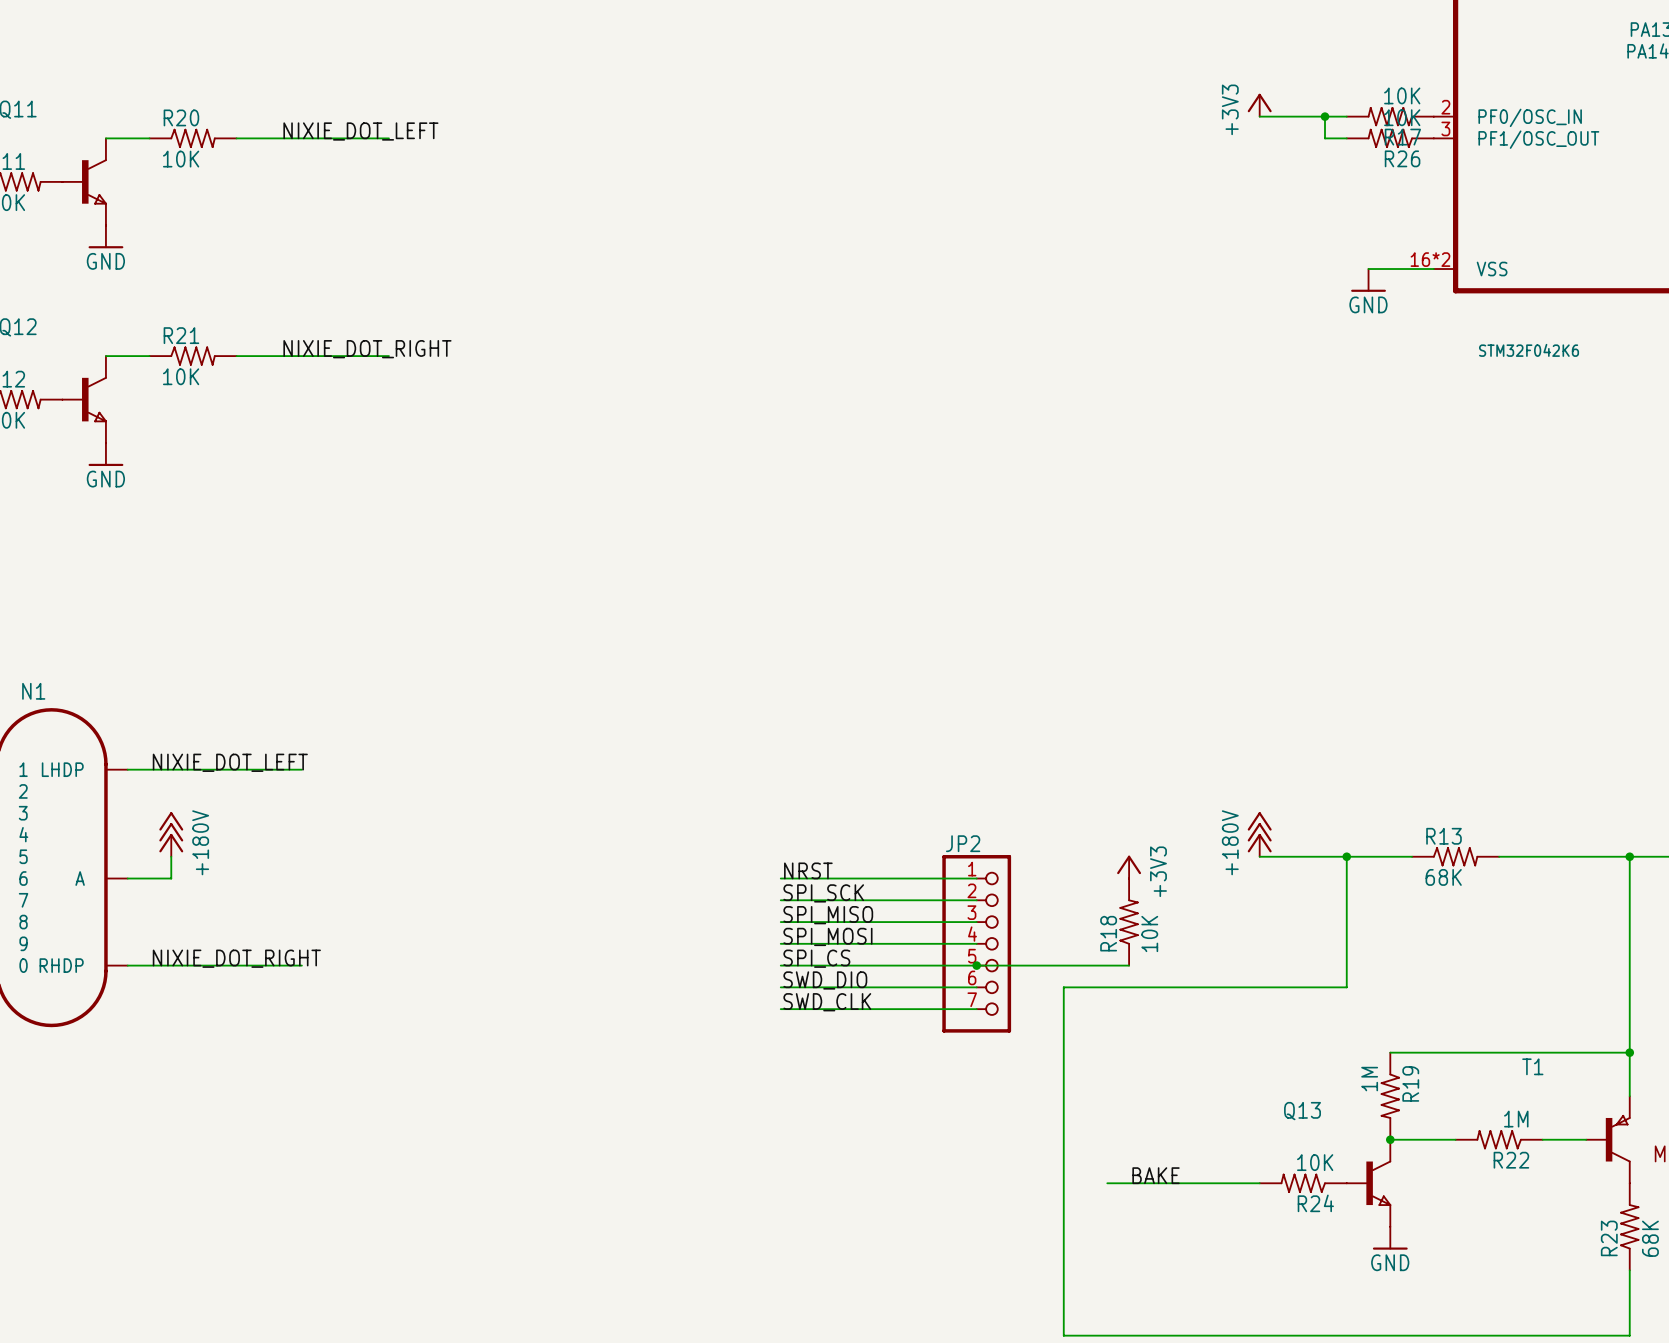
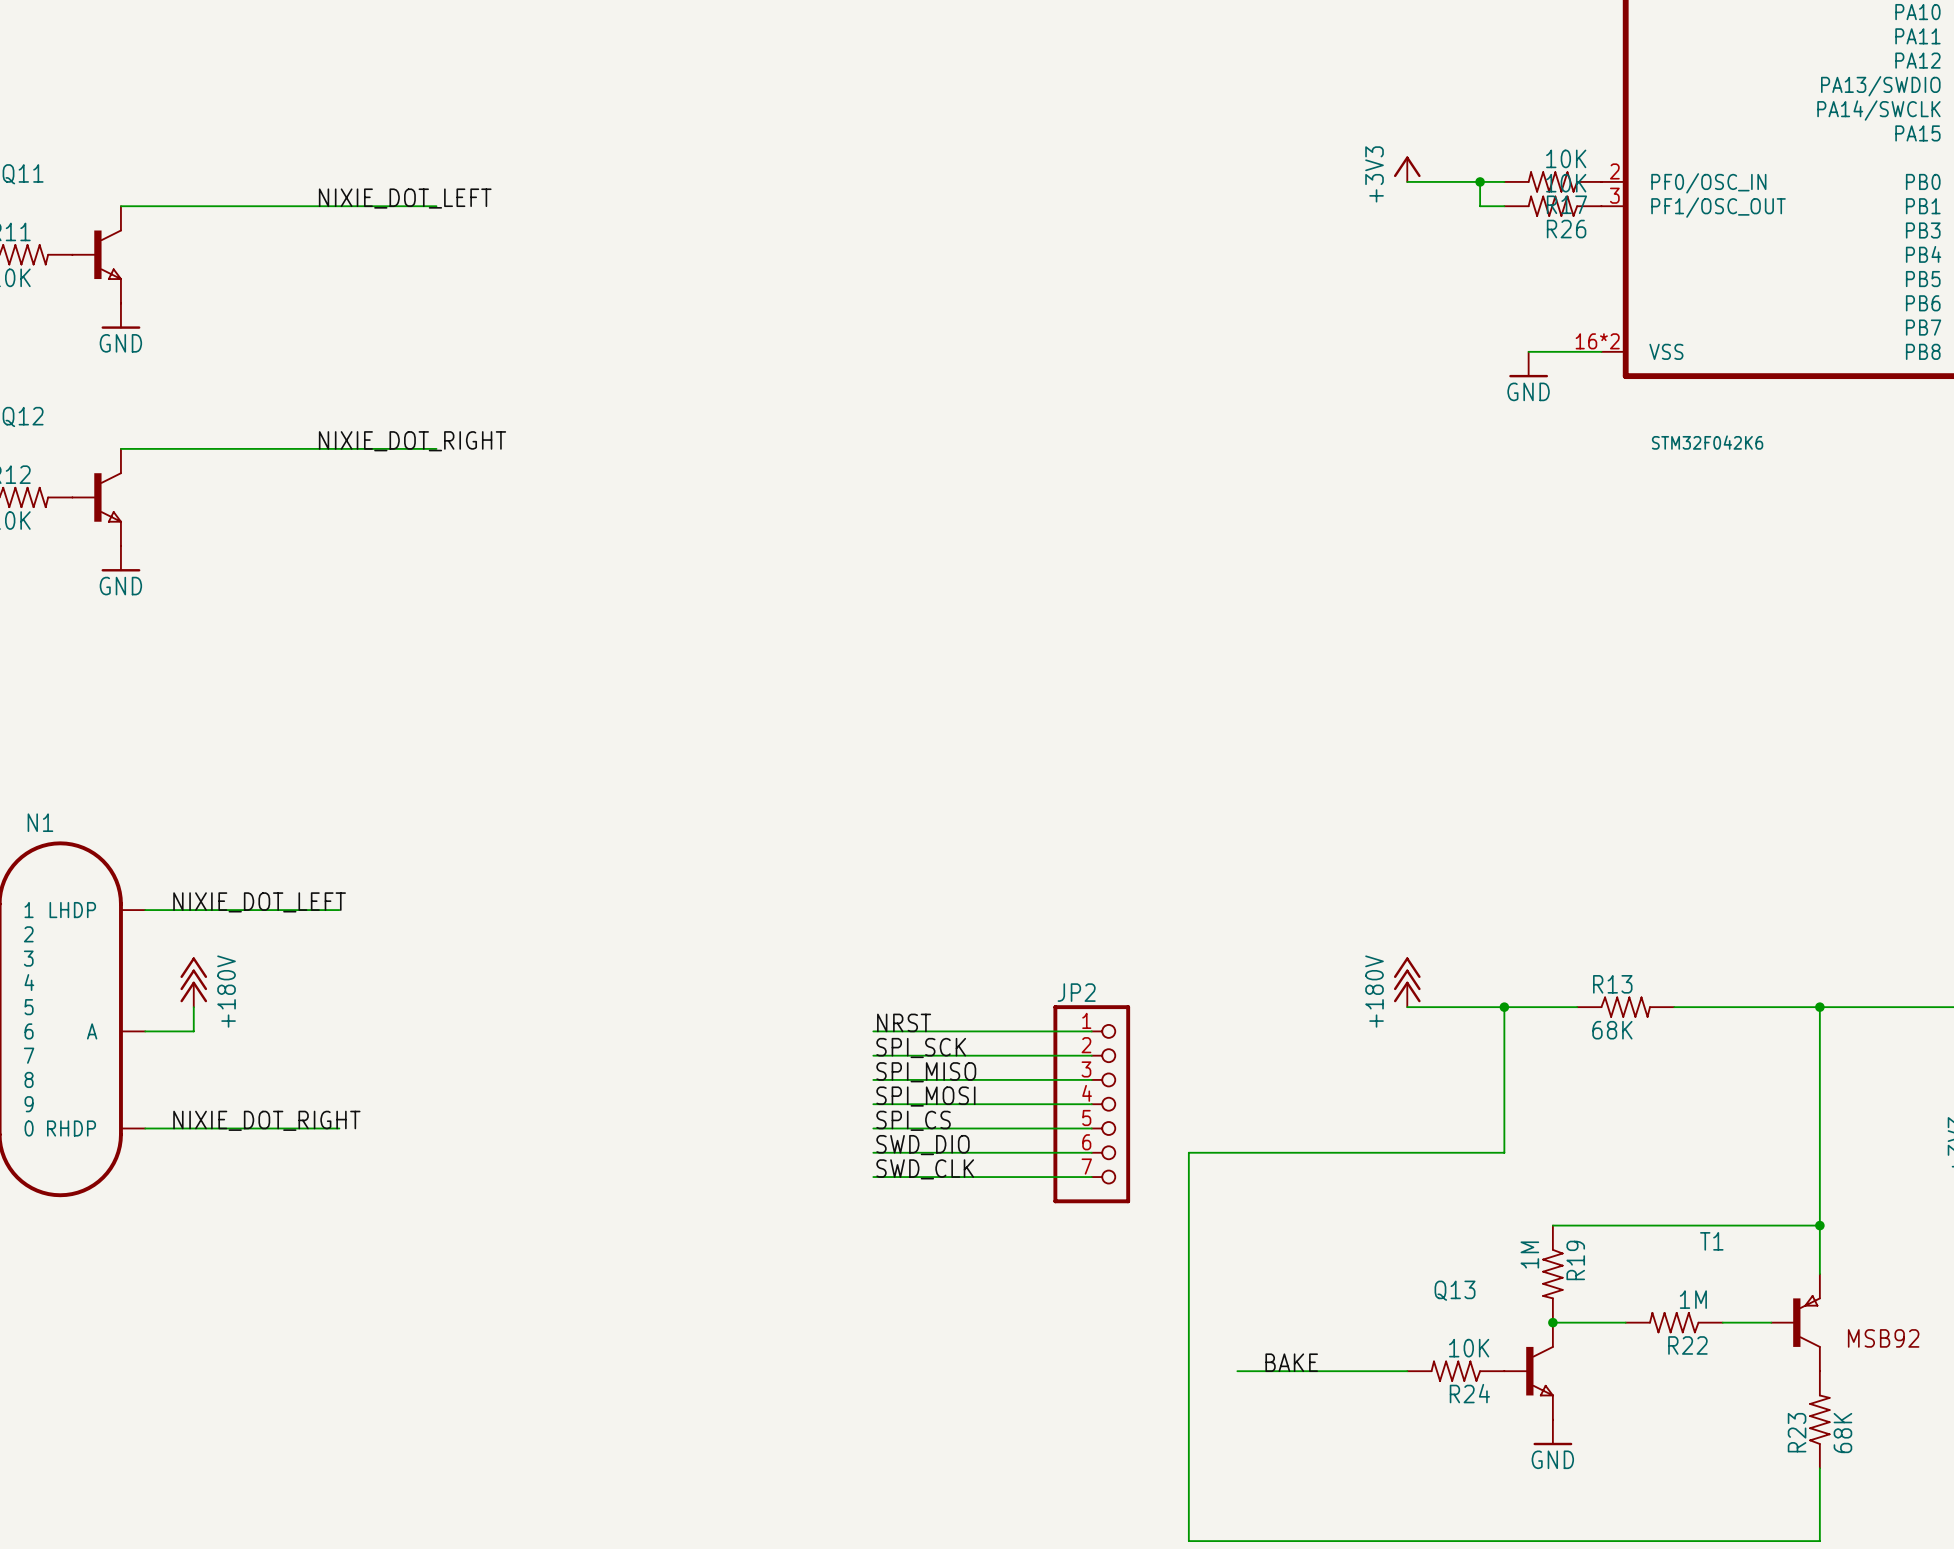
R20: 10K (193, 138) -> none
R21: 10K (193, 356) -> none
power symbol: +3V3 (1129, 867) -> none
R18: 10K (1129, 922) -> none
wire: (976, 965) (1129, 965) -> none
junction: (976, 965) -> none

